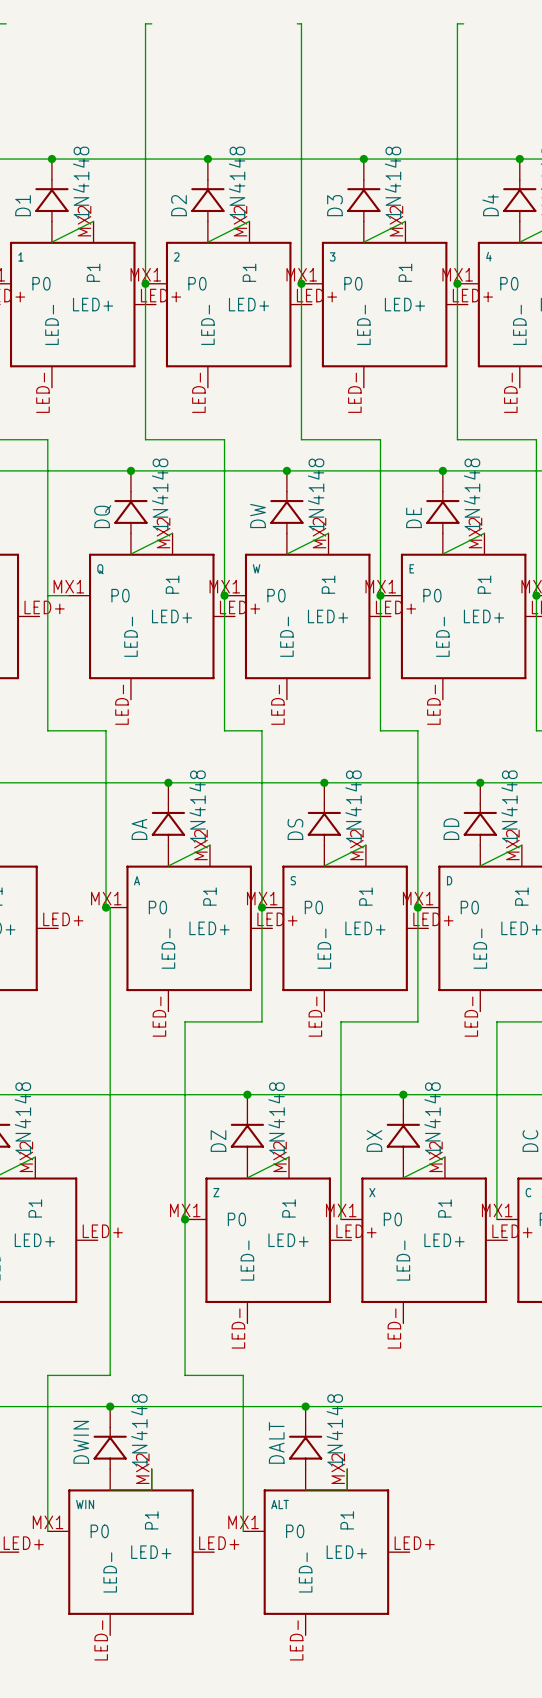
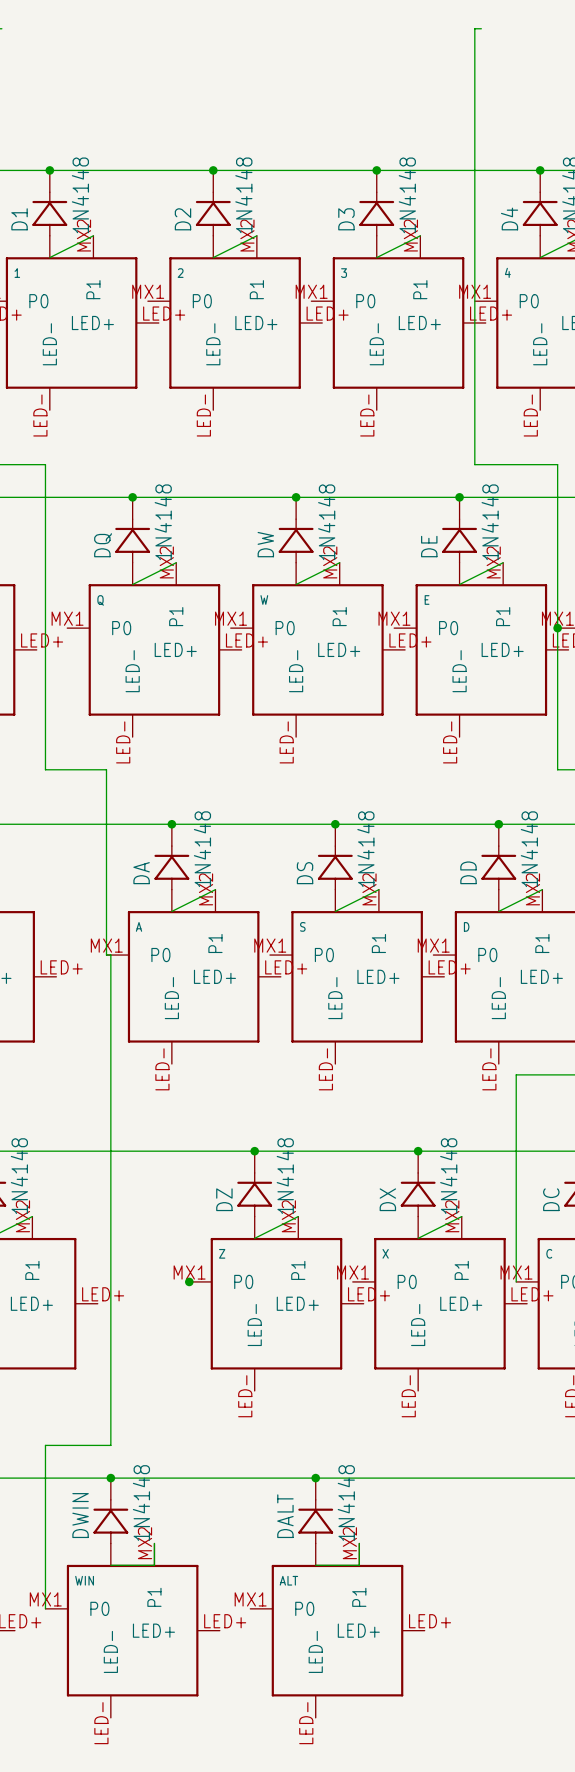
wire: (151, 23) (145, 23) (145, 439) (224, 439) (224, 730) (261, 730) (261, 1021) (185, 1021) (185, 1375) (243, 1375) (243, 1531) -> none
wire: (297, 23) (301, 23) (301, 439) (380, 439) (380, 730) (417, 730) (417, 1021) (340, 1021) (340, 1219) -> none
junction: (145, 283) -> none
junction: (301, 283) -> none
junction: (457, 283) -> none
wire: (47, 595) (68, 595) -> none
junction: (224, 595) -> none
junction: (380, 595) -> none
junction: (106, 907) -> none
junction: (261, 907) -> none
junction: (417, 907) -> none

